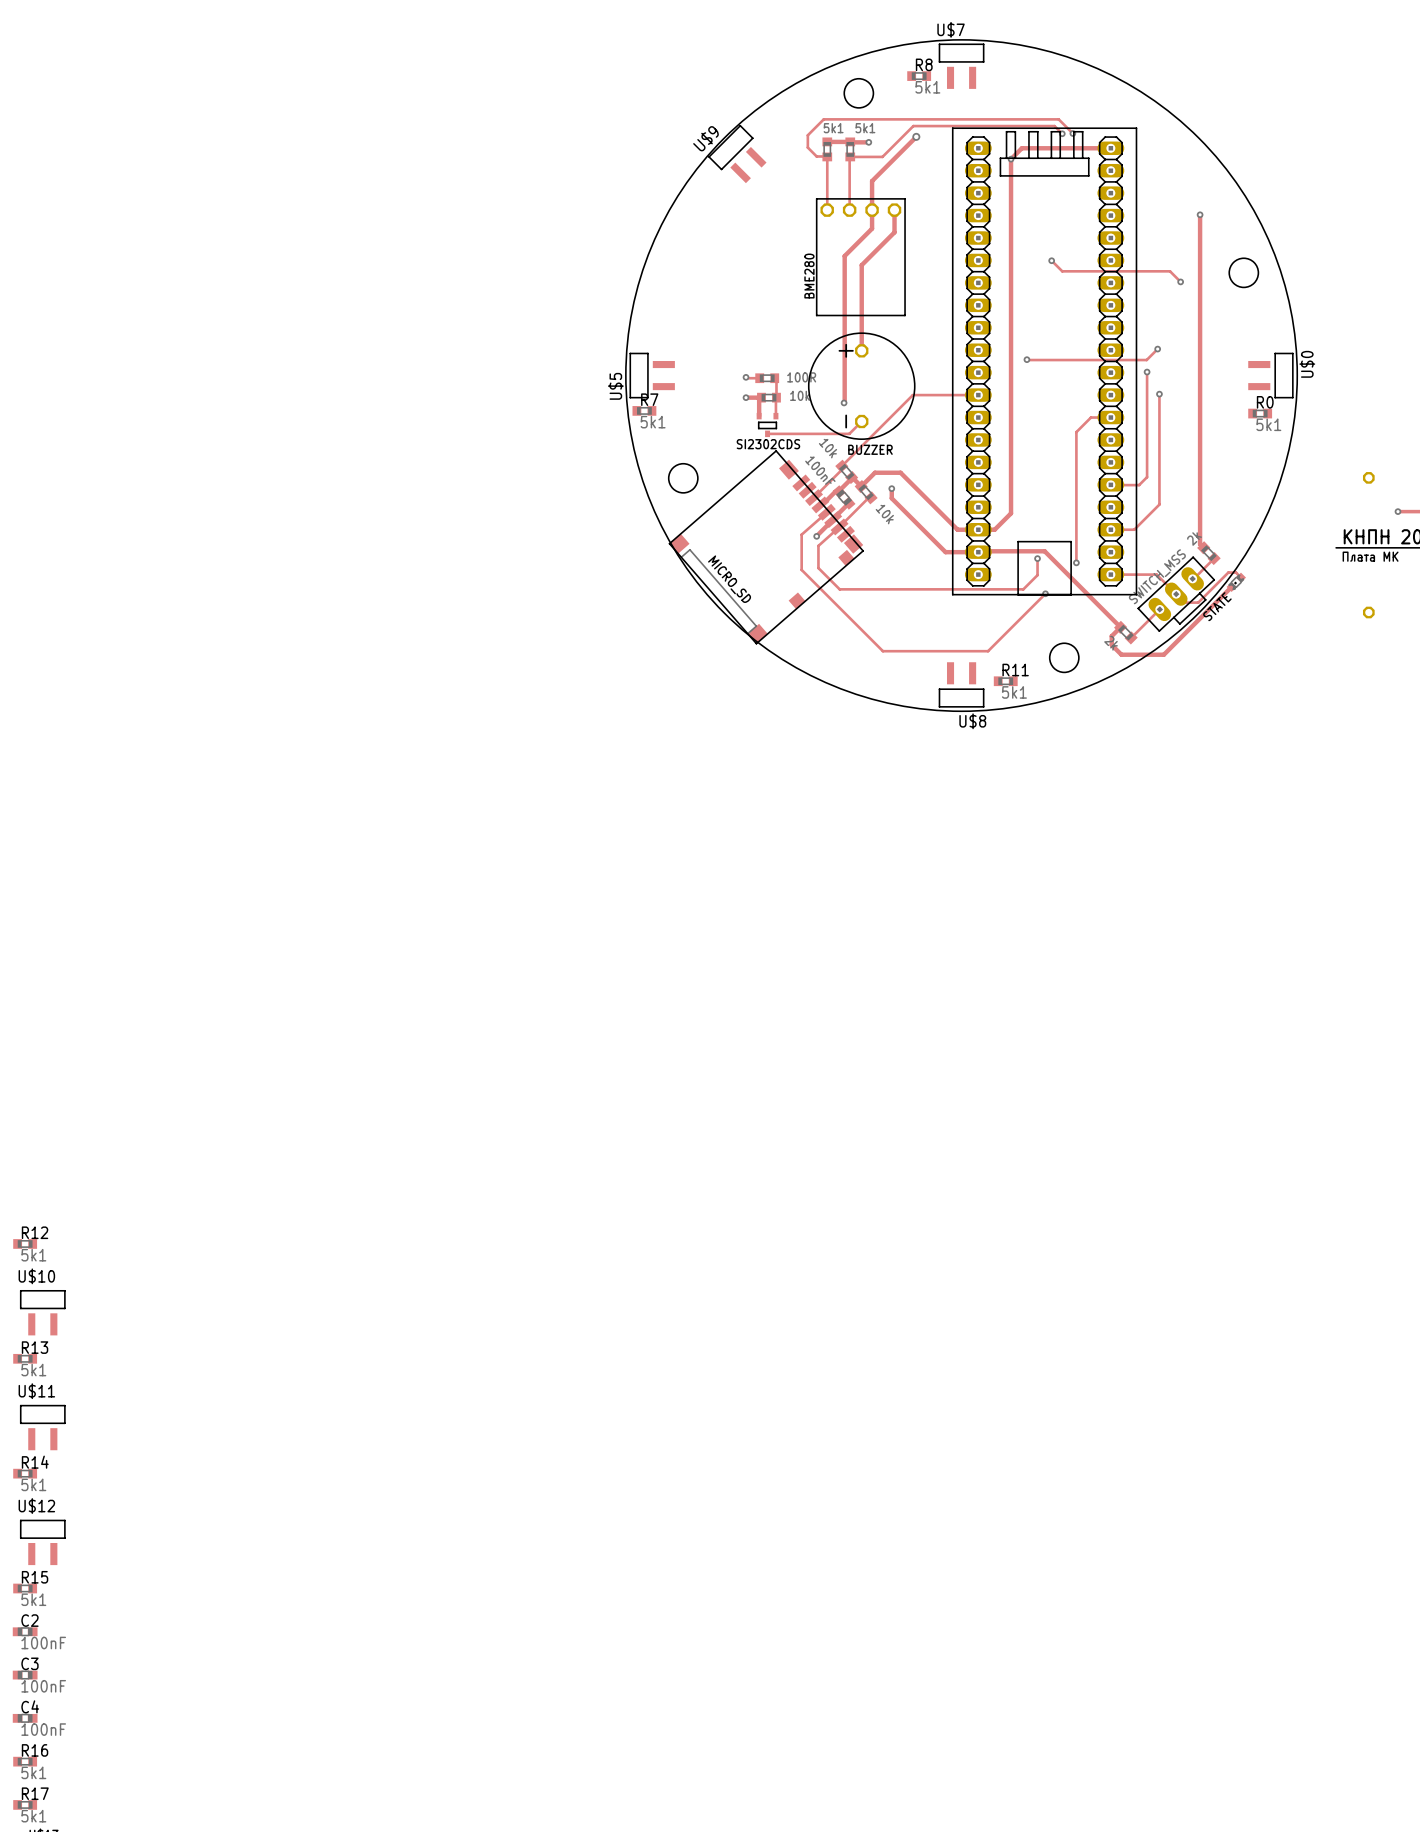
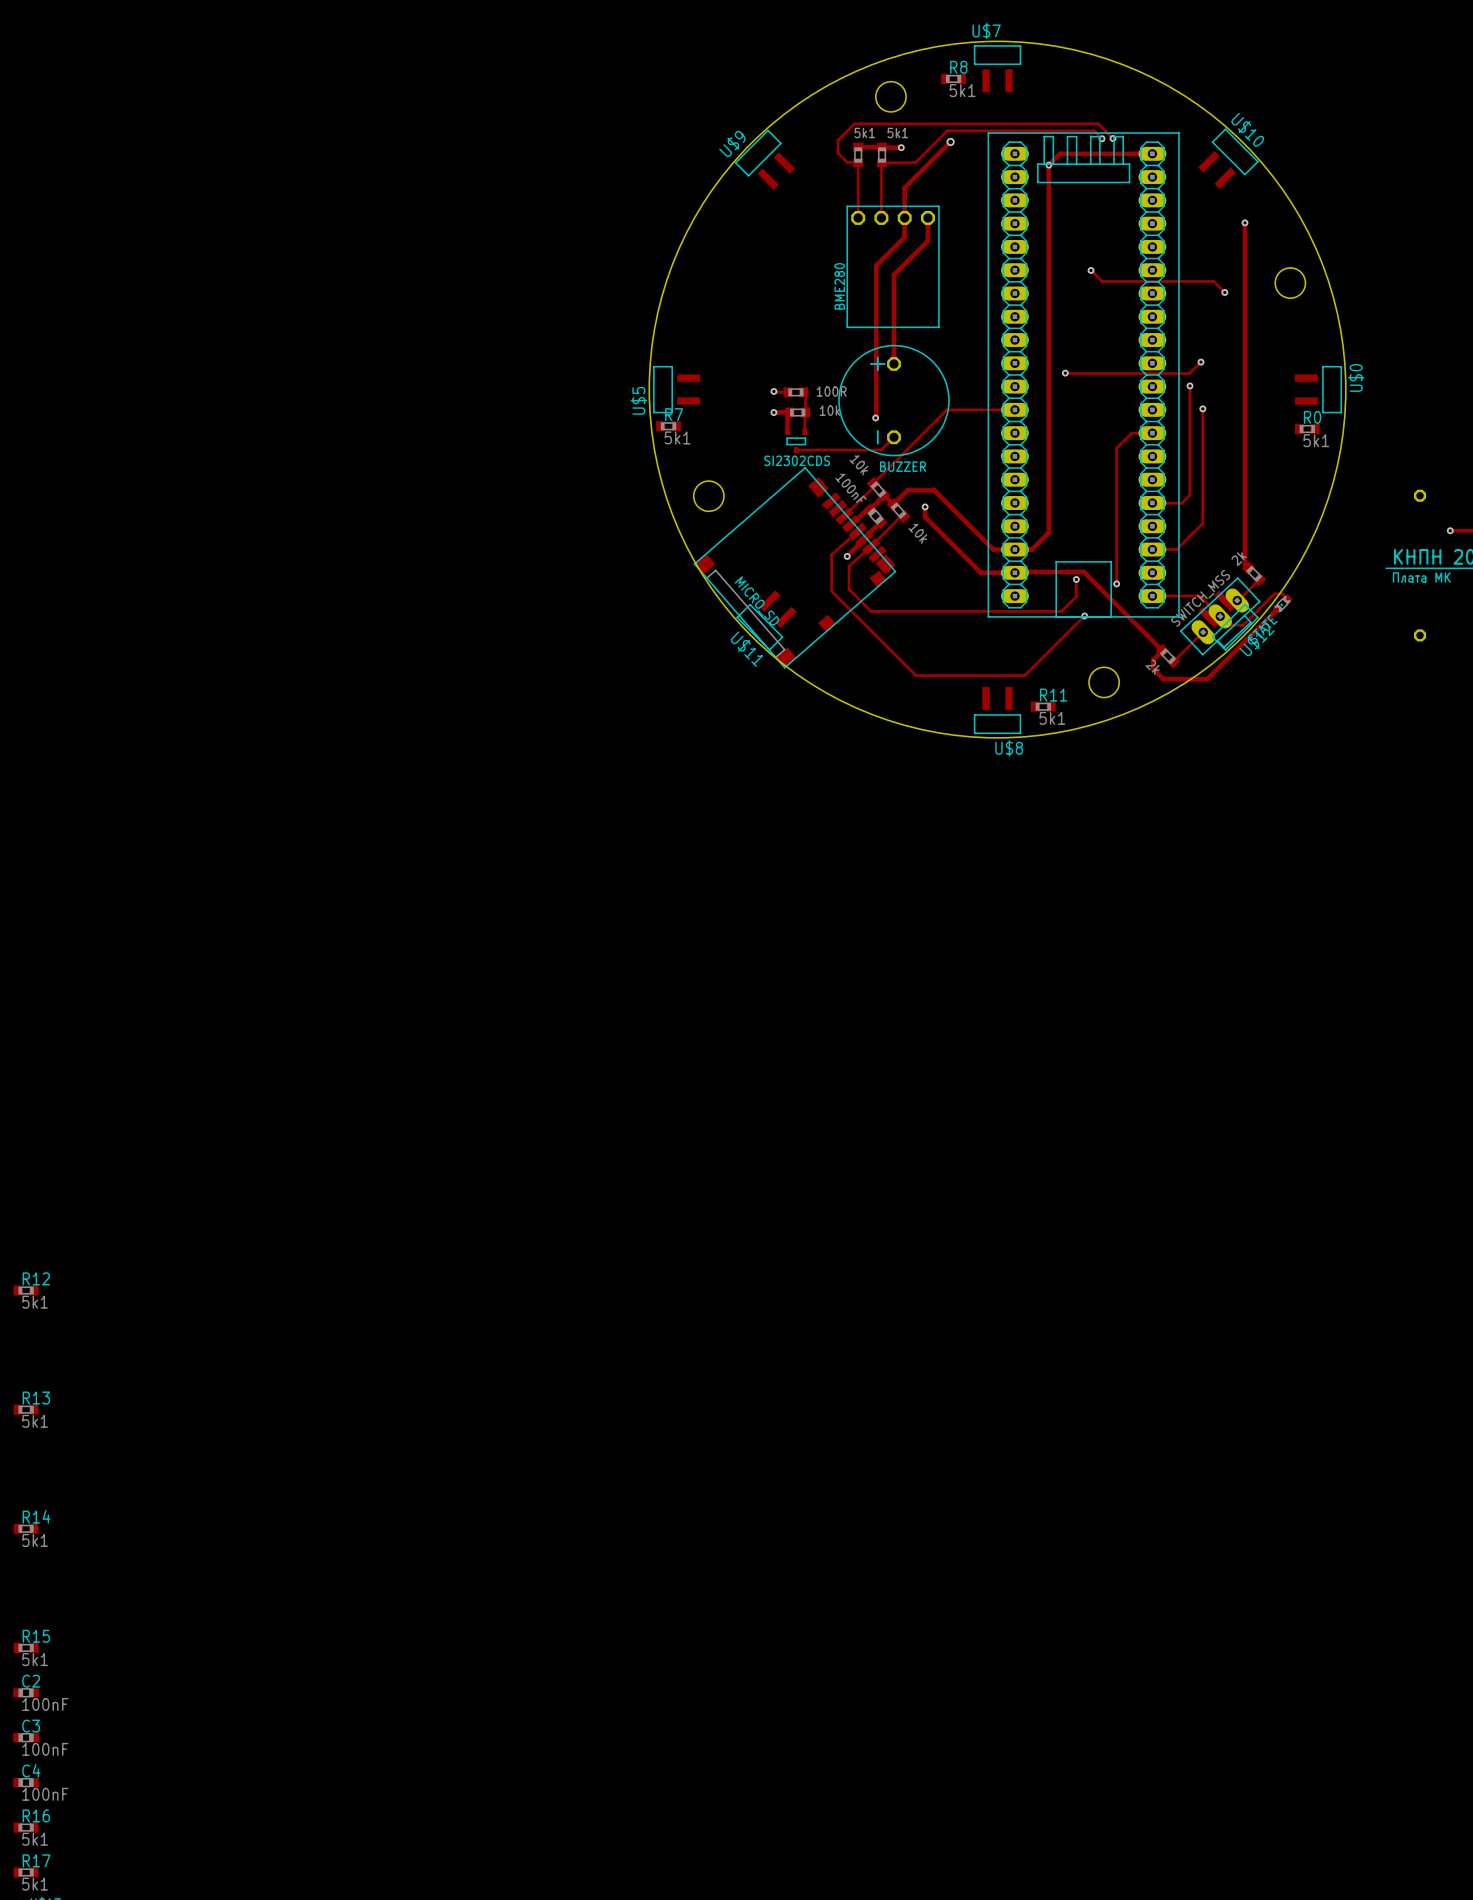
U$10 rotation: 0° (42, 1312) -> 45° clockwise (1228, 158)
U$10 position: (42, 1312) -> (1228, 158)
U$11 rotation: 0° (42, 1427) -> 135° counterclockwise (766, 620)
U$11 position: (42, 1427) -> (766, 620)
U$12 rotation: 0° (42, 1542) -> 135° clockwise (1228, 620)
U$12 position: (42, 1542) -> (1228, 620)

